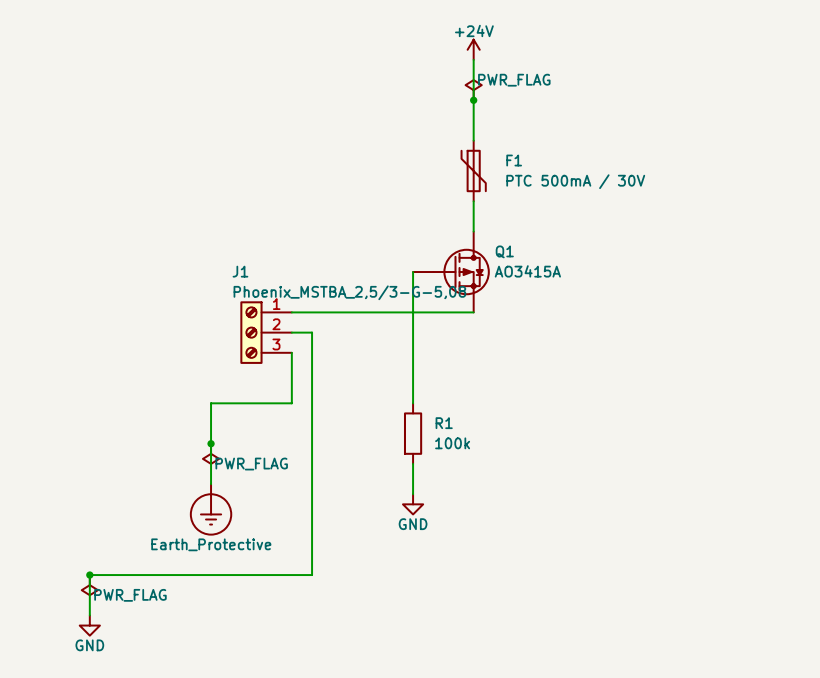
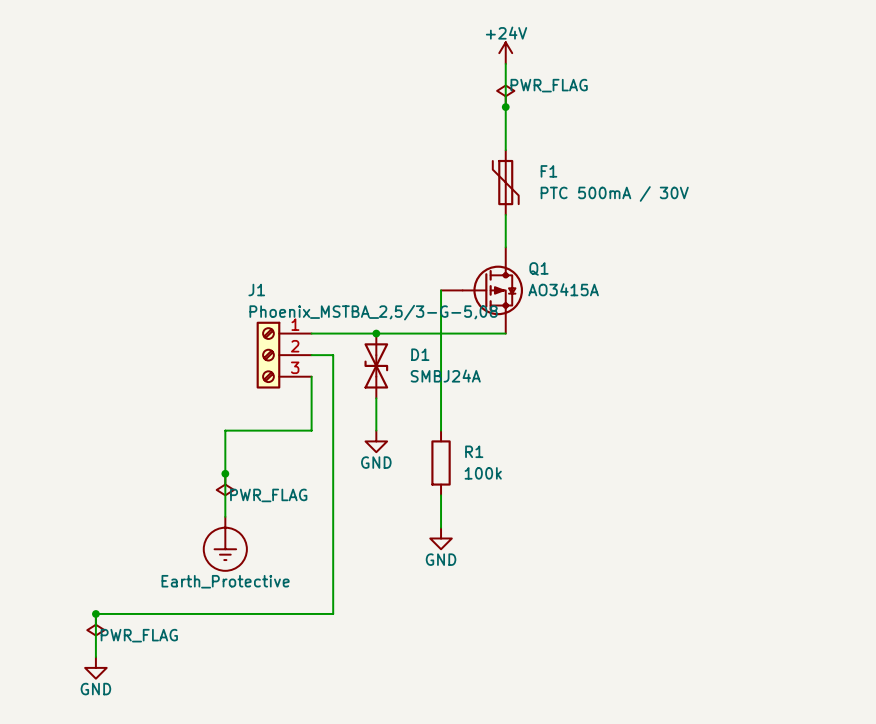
junction: none -> (376, 333)
D1: none -> SMBJ24A (376, 365)
wire: none -> (376, 398) (376, 430)
power symbol: none -> GND (376, 441)

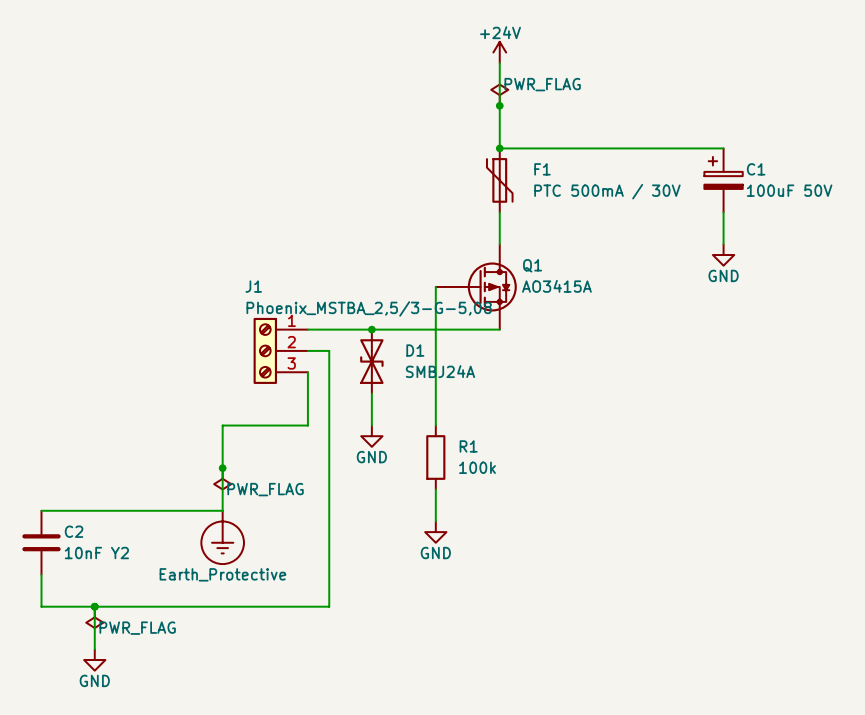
wire: none -> (499, 148) (723, 148)
junction: none -> (499, 148)
C1: none -> 100uF 50V (723, 180)
wire: none -> (723, 212) (723, 244)
power symbol: none -> GND (723, 255)
wire: none -> (41, 510) (222, 510)
C2: none -> 10nF Y2 (41, 542)
wire: none -> (41, 574) (41, 606) (94, 606)

